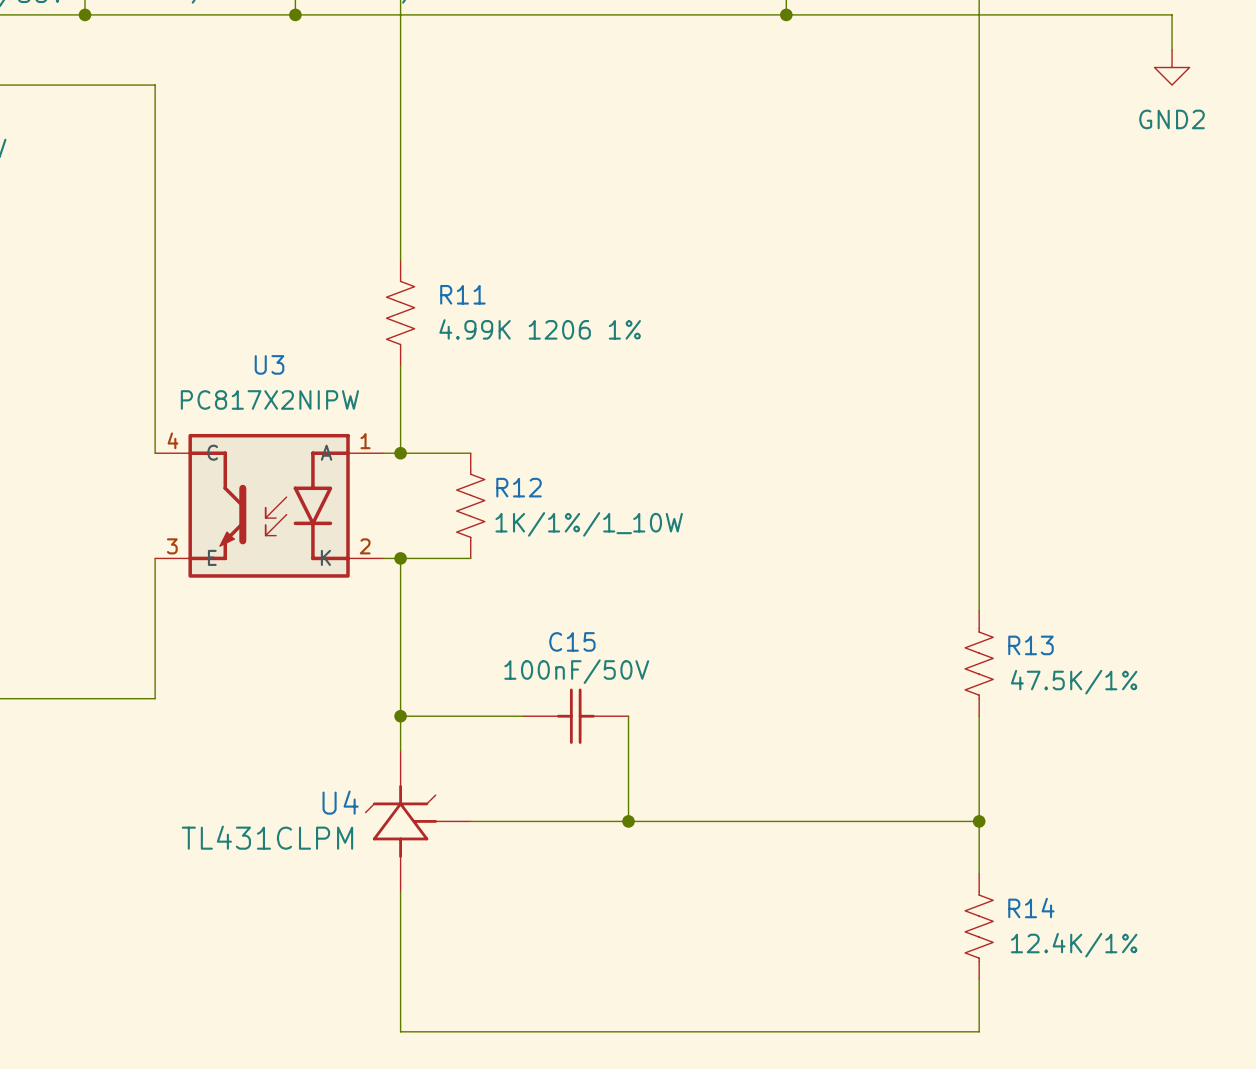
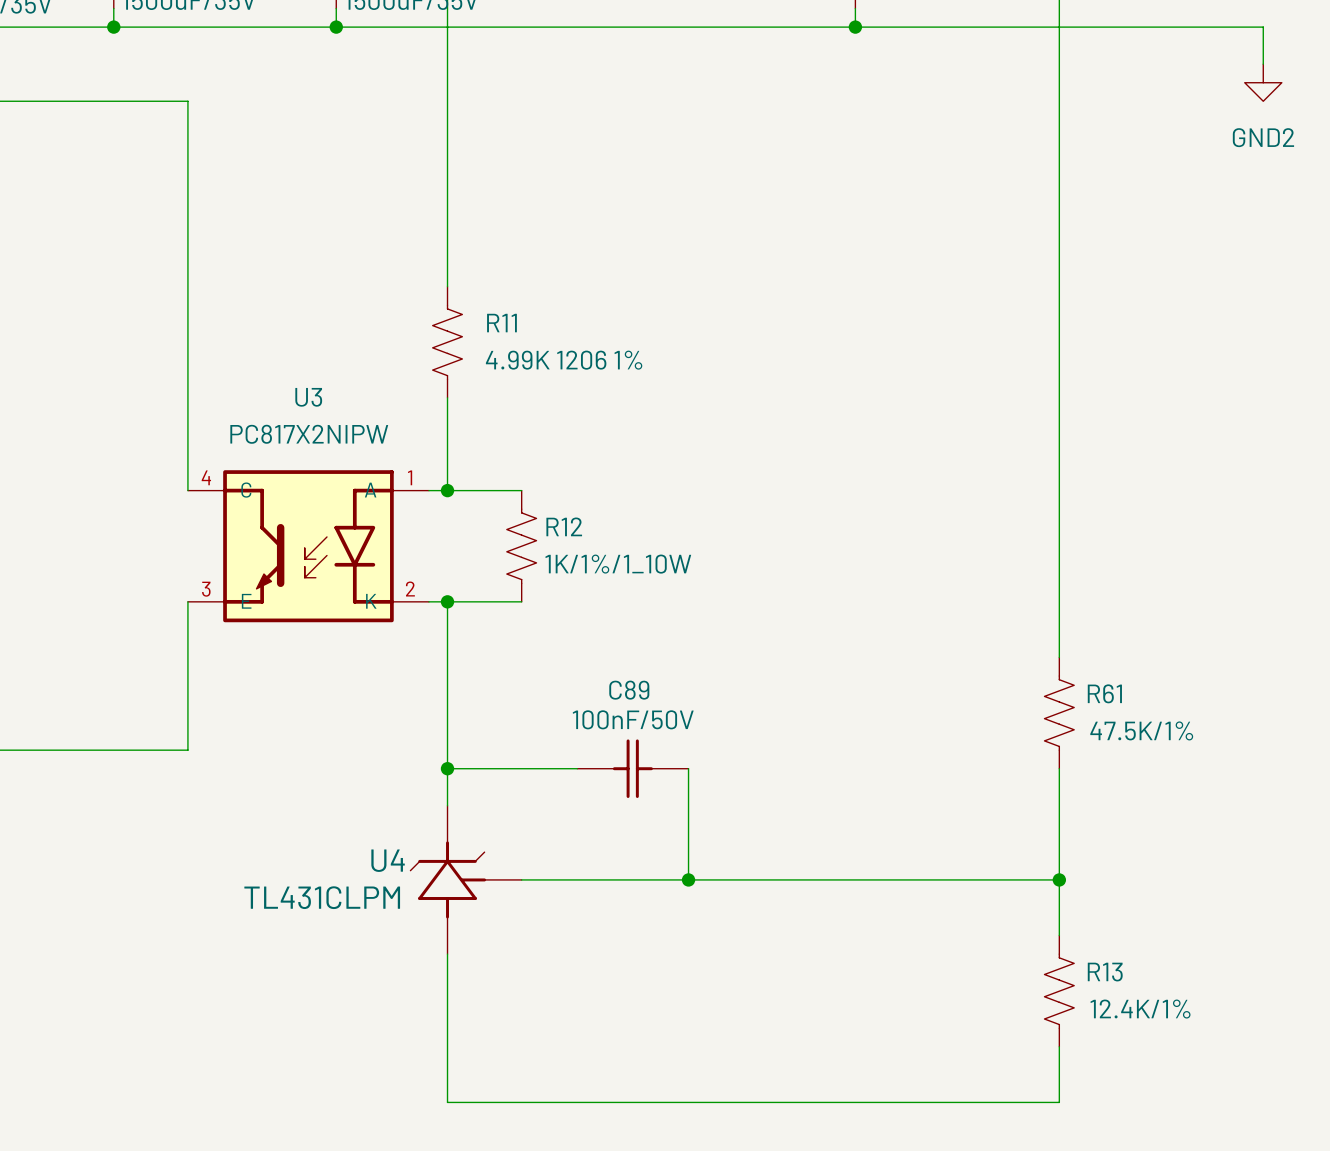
C15 name: C15 (572, 641) -> C89 (629, 690)
R13 name: R13 (1030, 645) -> R61 (1104, 693)
R14 name: R14 (1031, 908) -> R13 (1105, 972)

